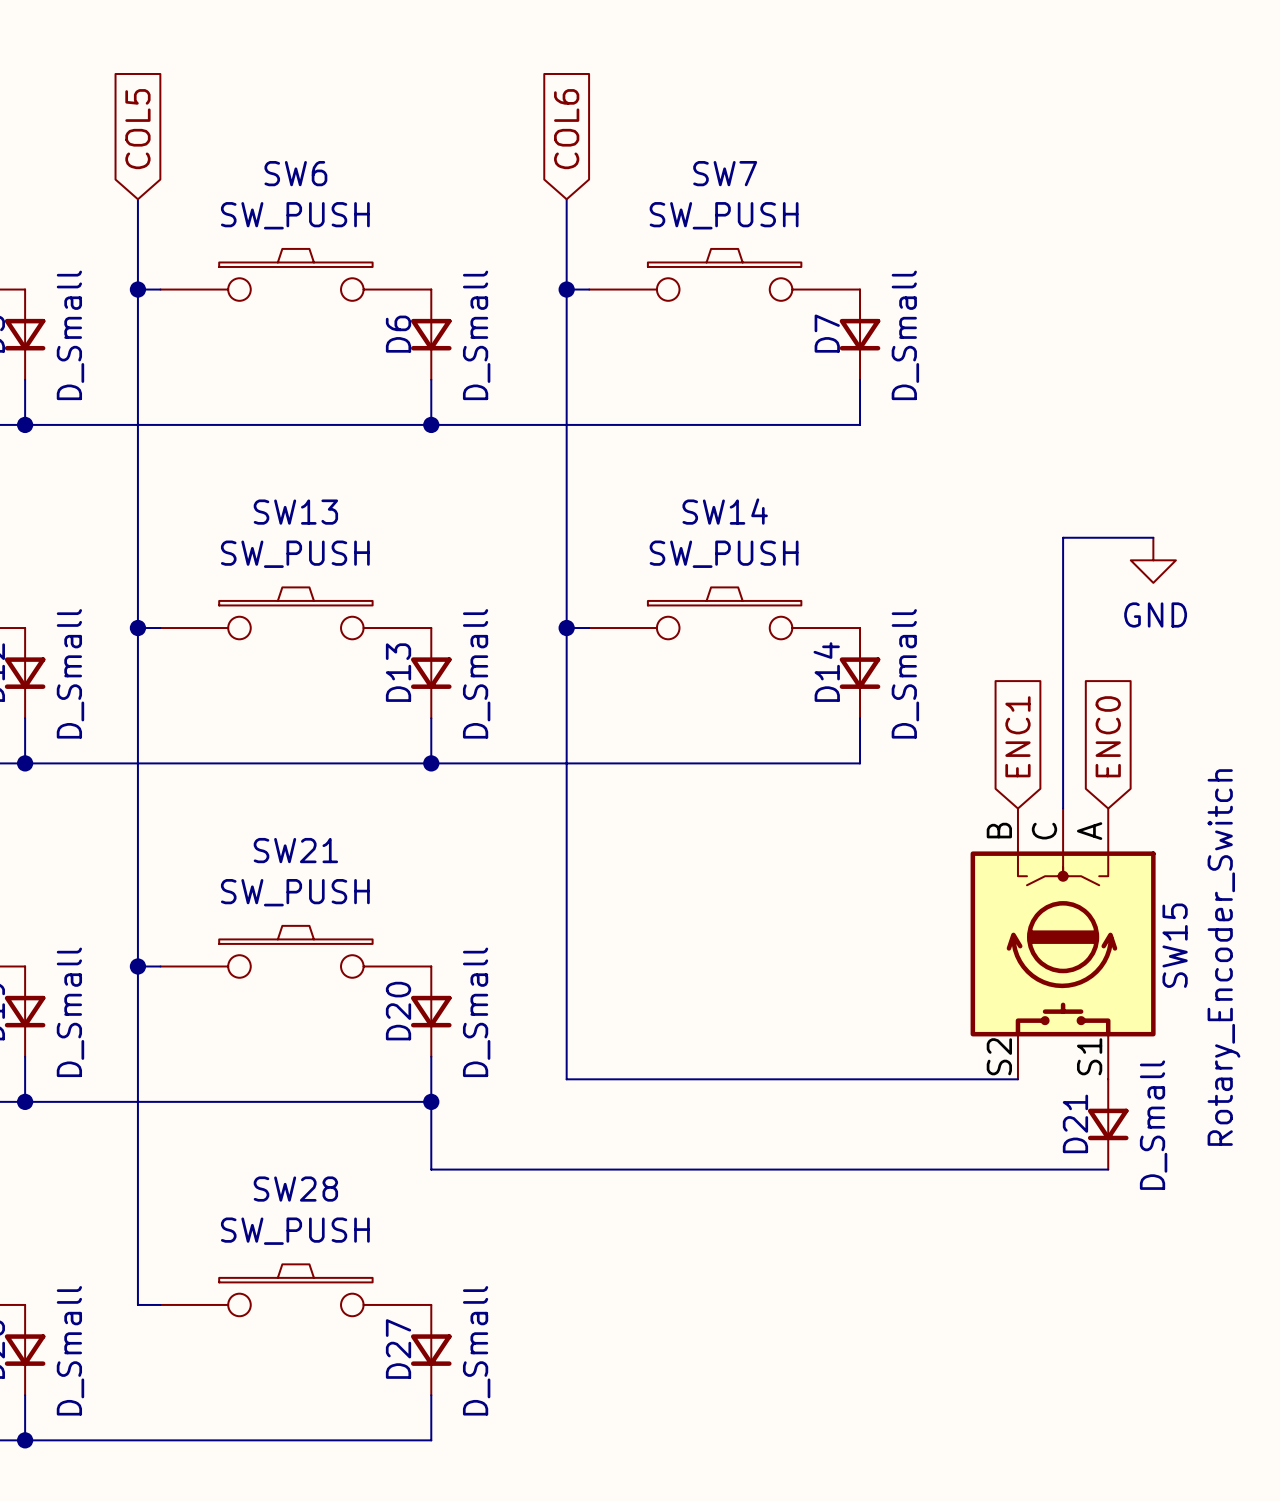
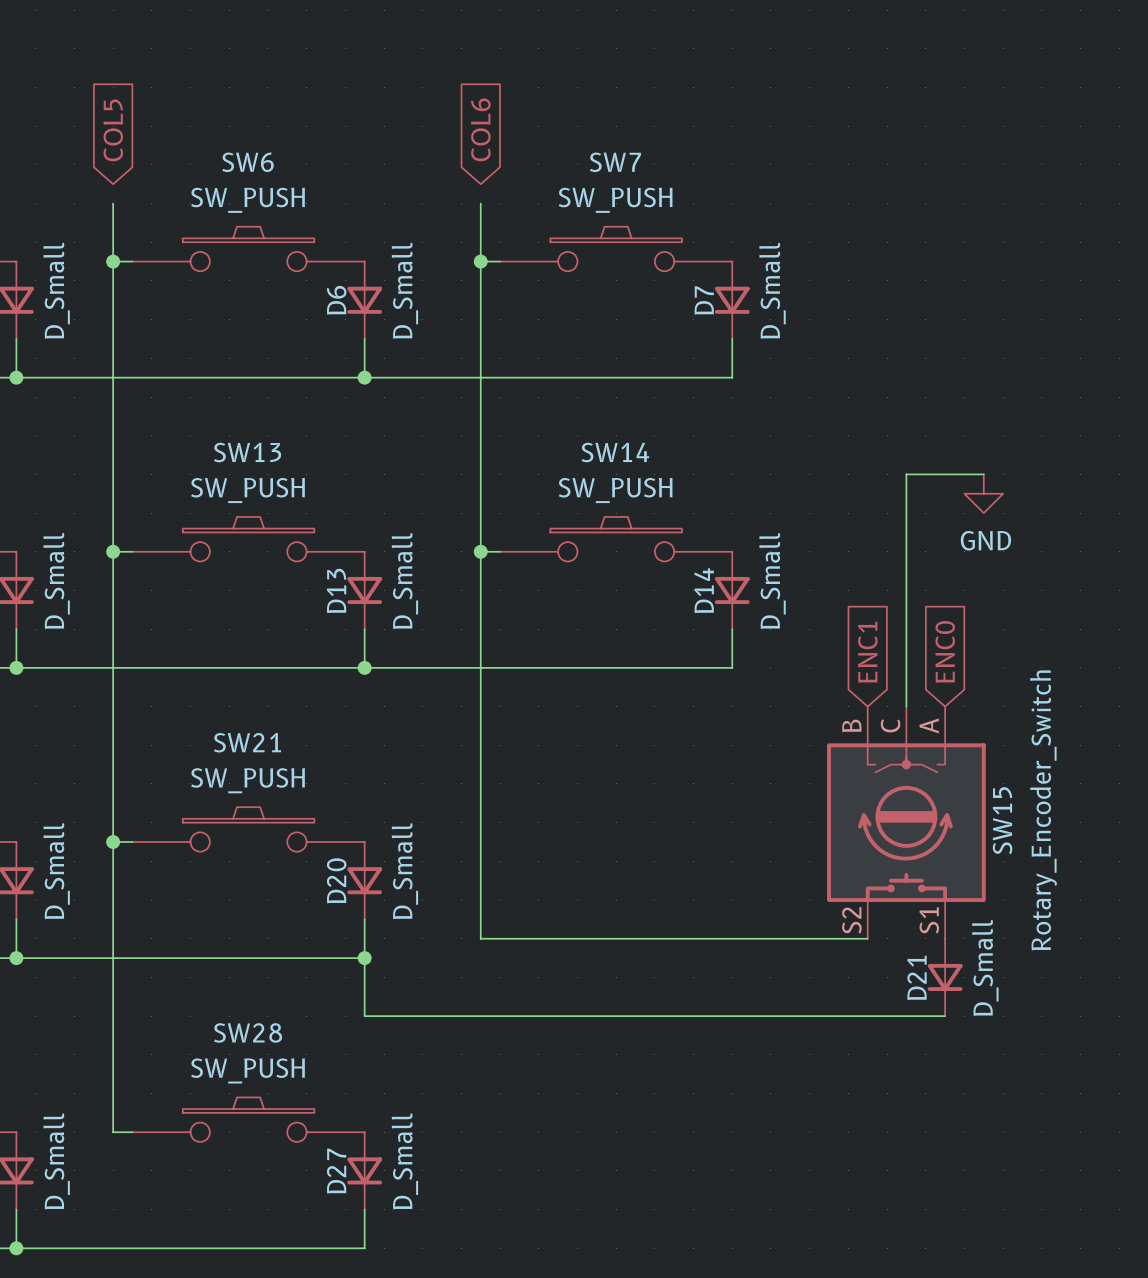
wire: (137, 199) (137, 221) -> none
wire: (566, 199) (566, 221) -> none

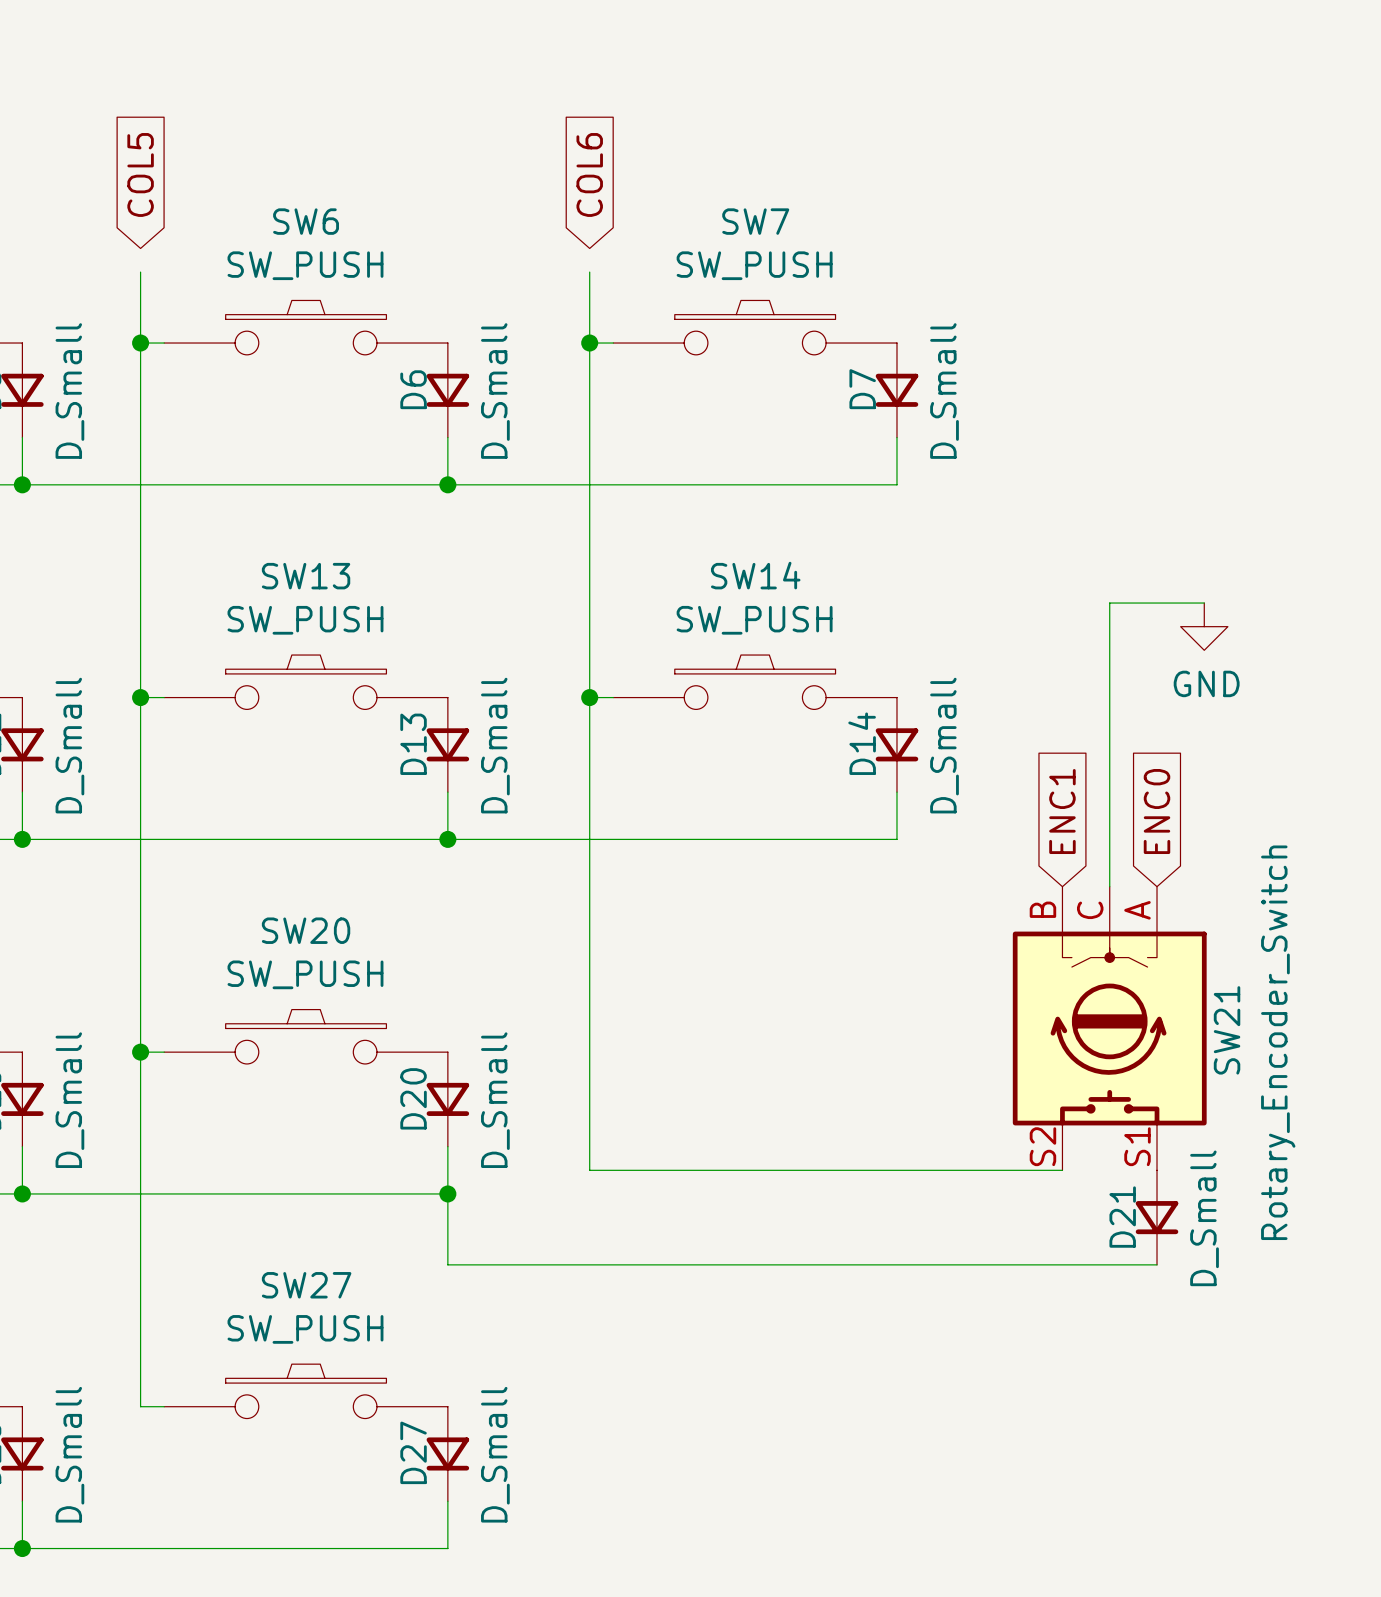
SW21 name: SW21 (247, 742) -> SW20 (306, 930)
SW15 name: SW15 (1002, 820) -> SW21 (1227, 1030)
SW28 name: SW28 (248, 1032) -> SW27 (306, 1285)

